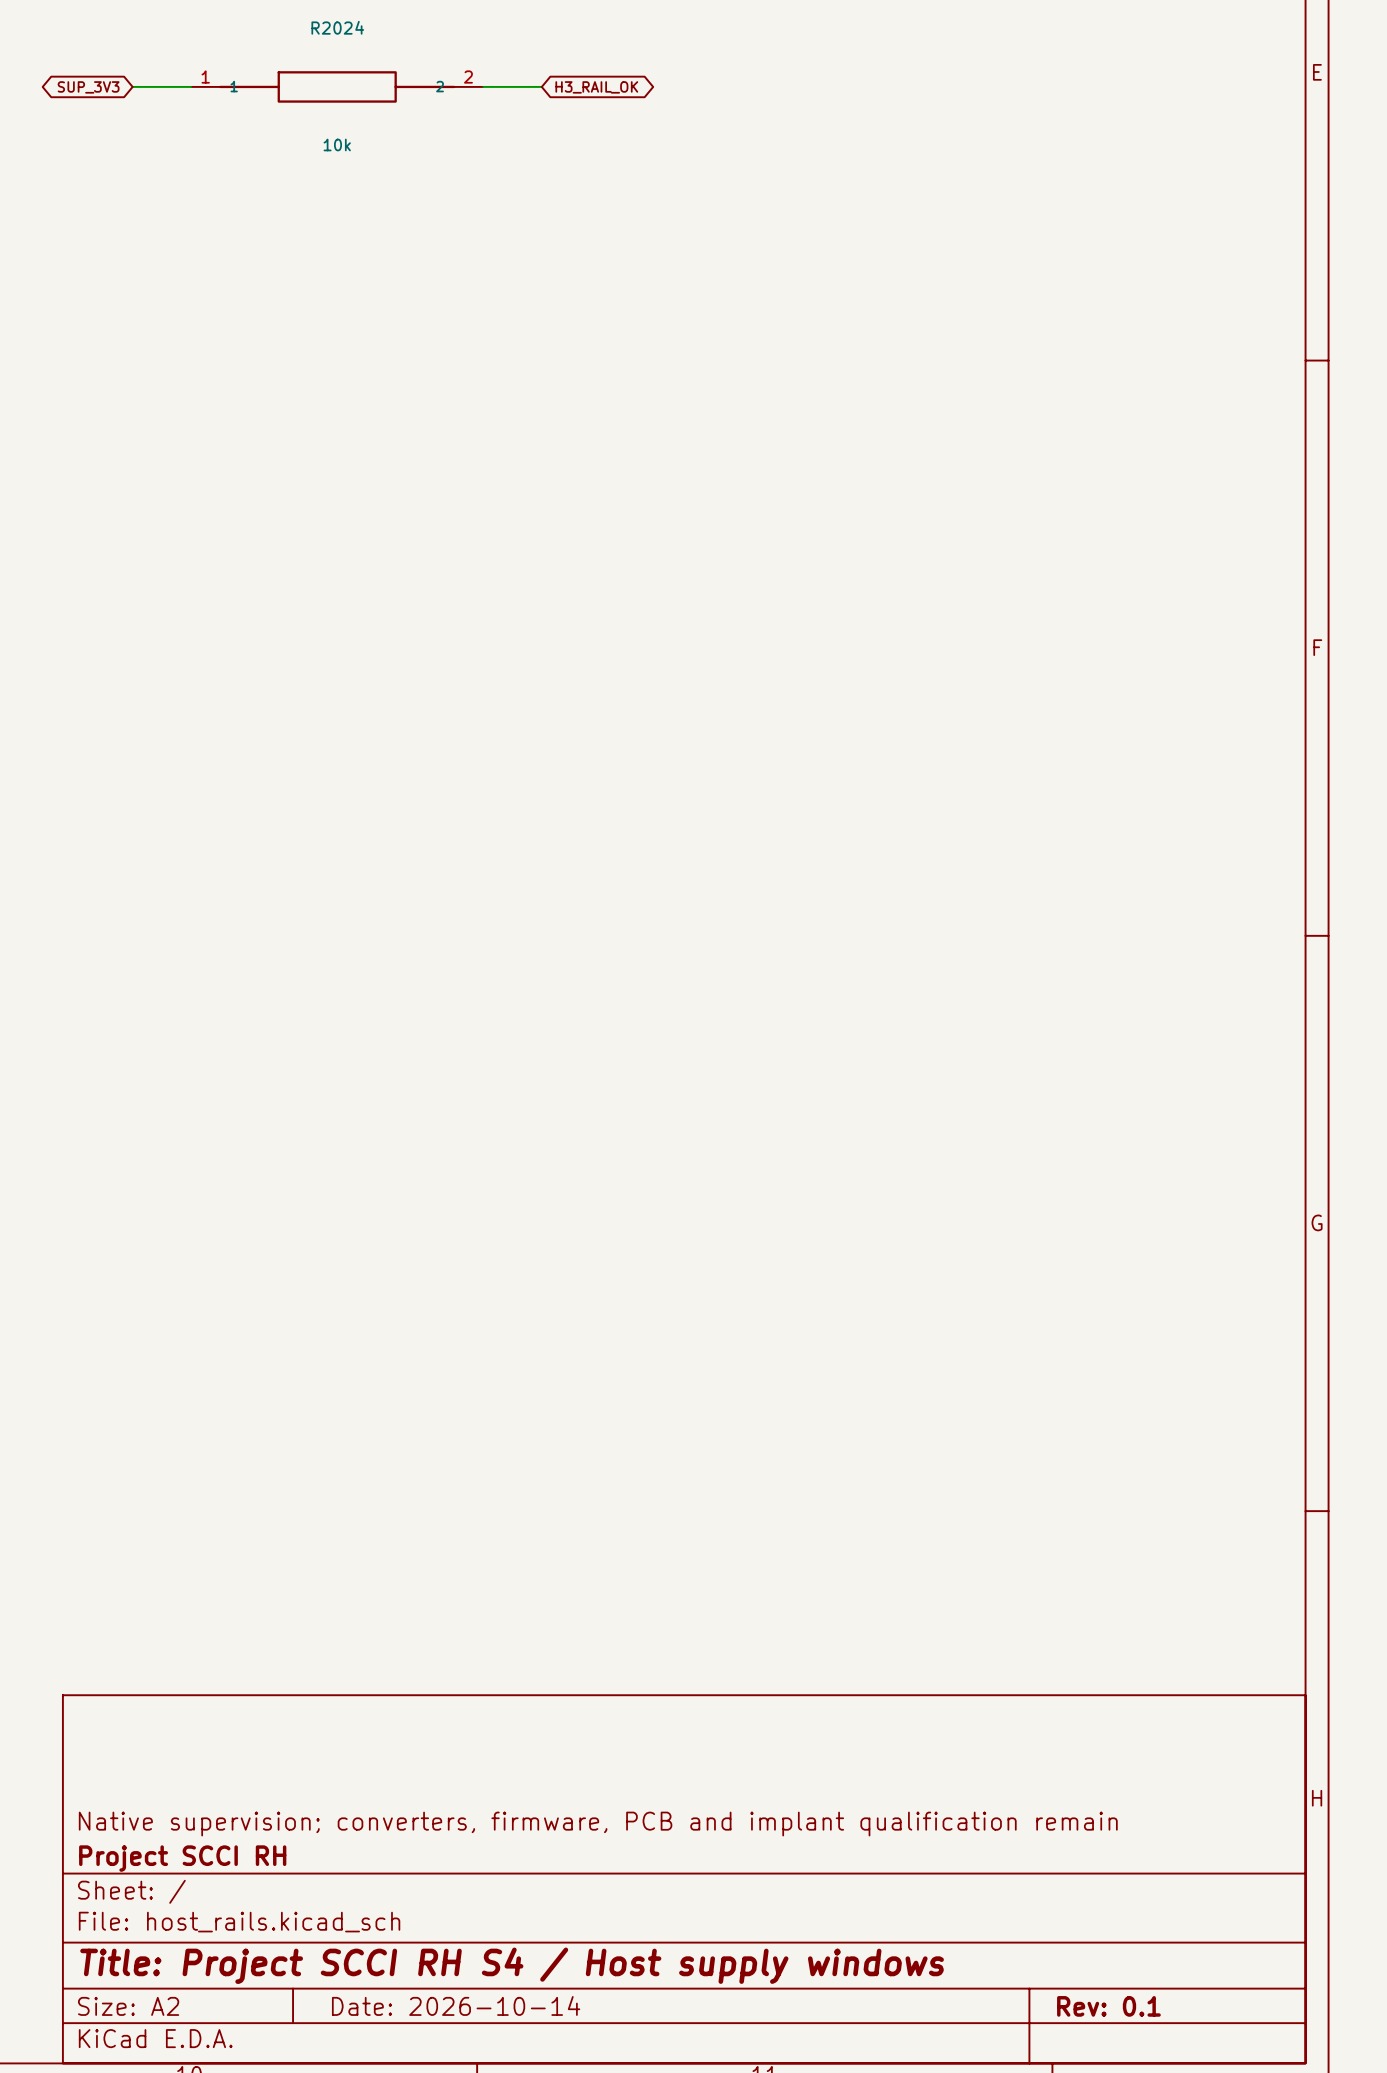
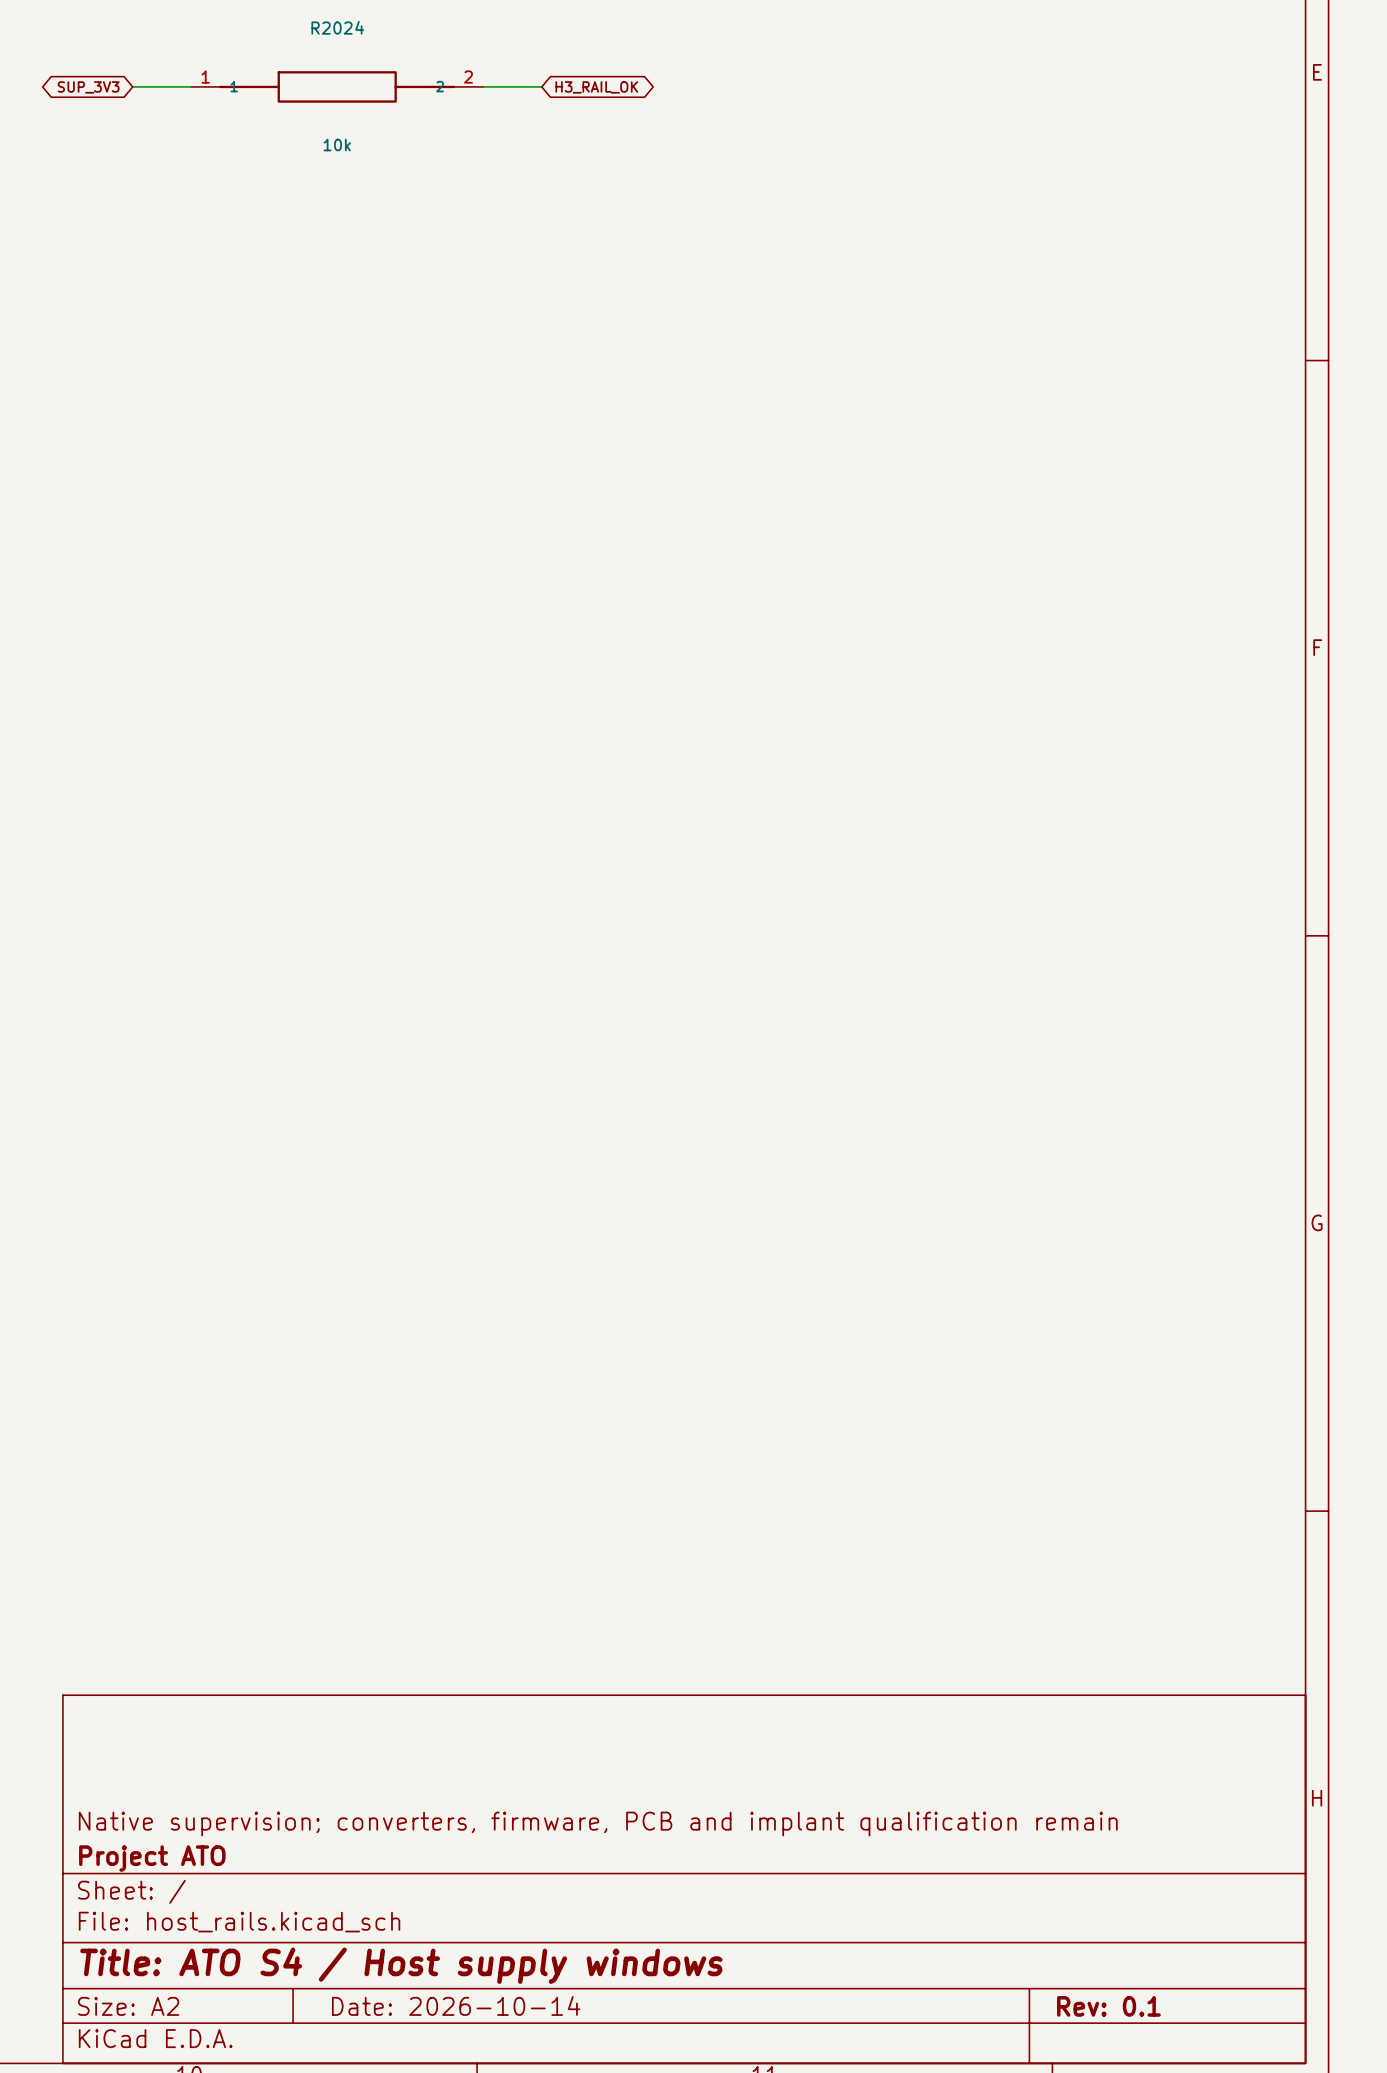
title block: Project SCCI RH (182, 1858) -> Project ATO (152, 1858)
title block: Title: Project SCCI RH S4 / Host supply windows (512, 1965) -> Title: ATO S4 / Host supply windows (401, 1965)

